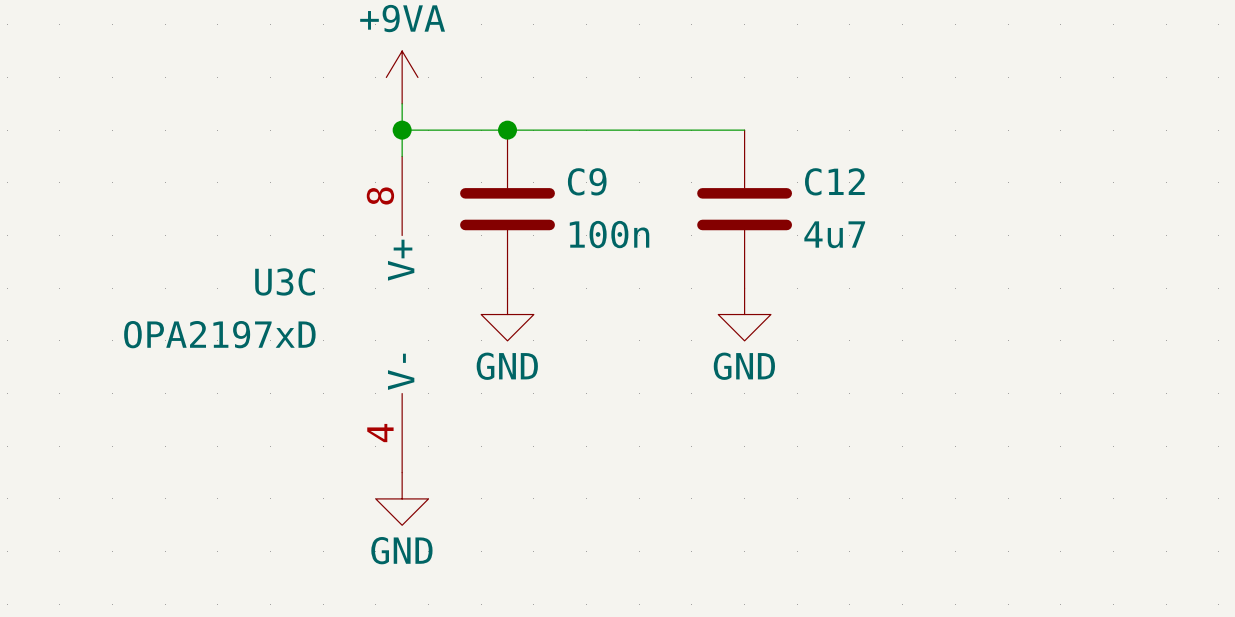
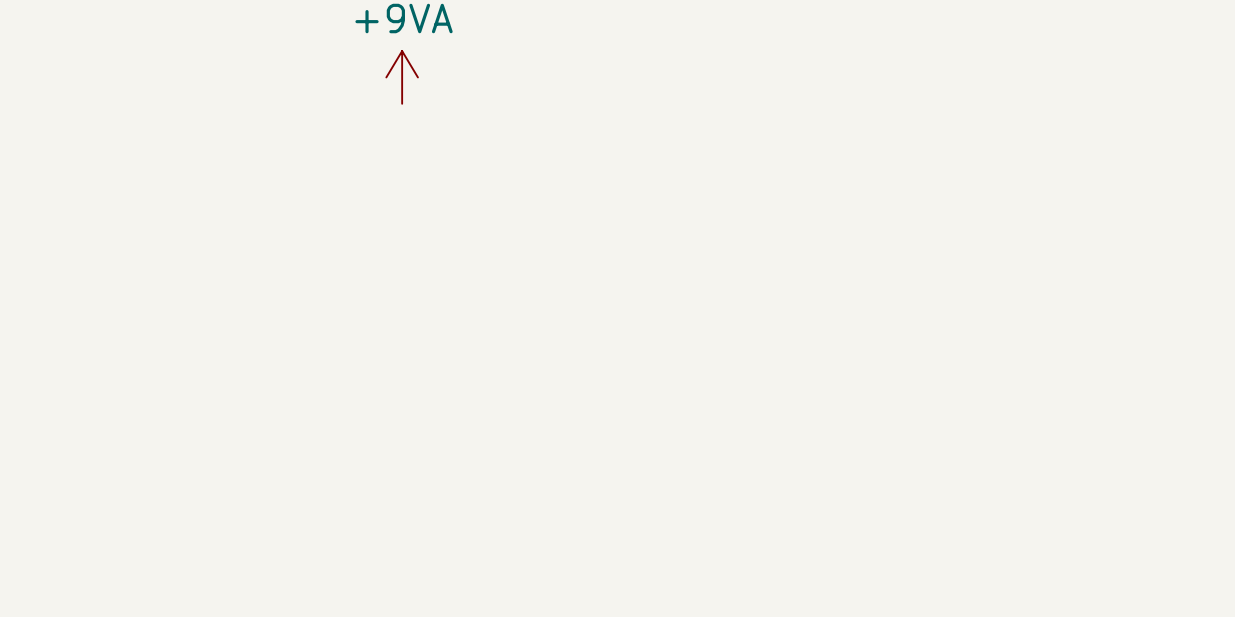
wire: (402, 103) (402, 156) -> none
wire: (402, 130) (744, 130) -> none
junction: (402, 130) -> none
junction: (507, 130) -> none
C9: 100n (507, 209) -> none
C12: 4u7 (744, 209) -> none
U3C: OPA2197xD (402, 314) -> none
power symbol: GND (507, 314) -> none
power symbol: GND (744, 314) -> none
power symbol: GND (402, 498) -> none

